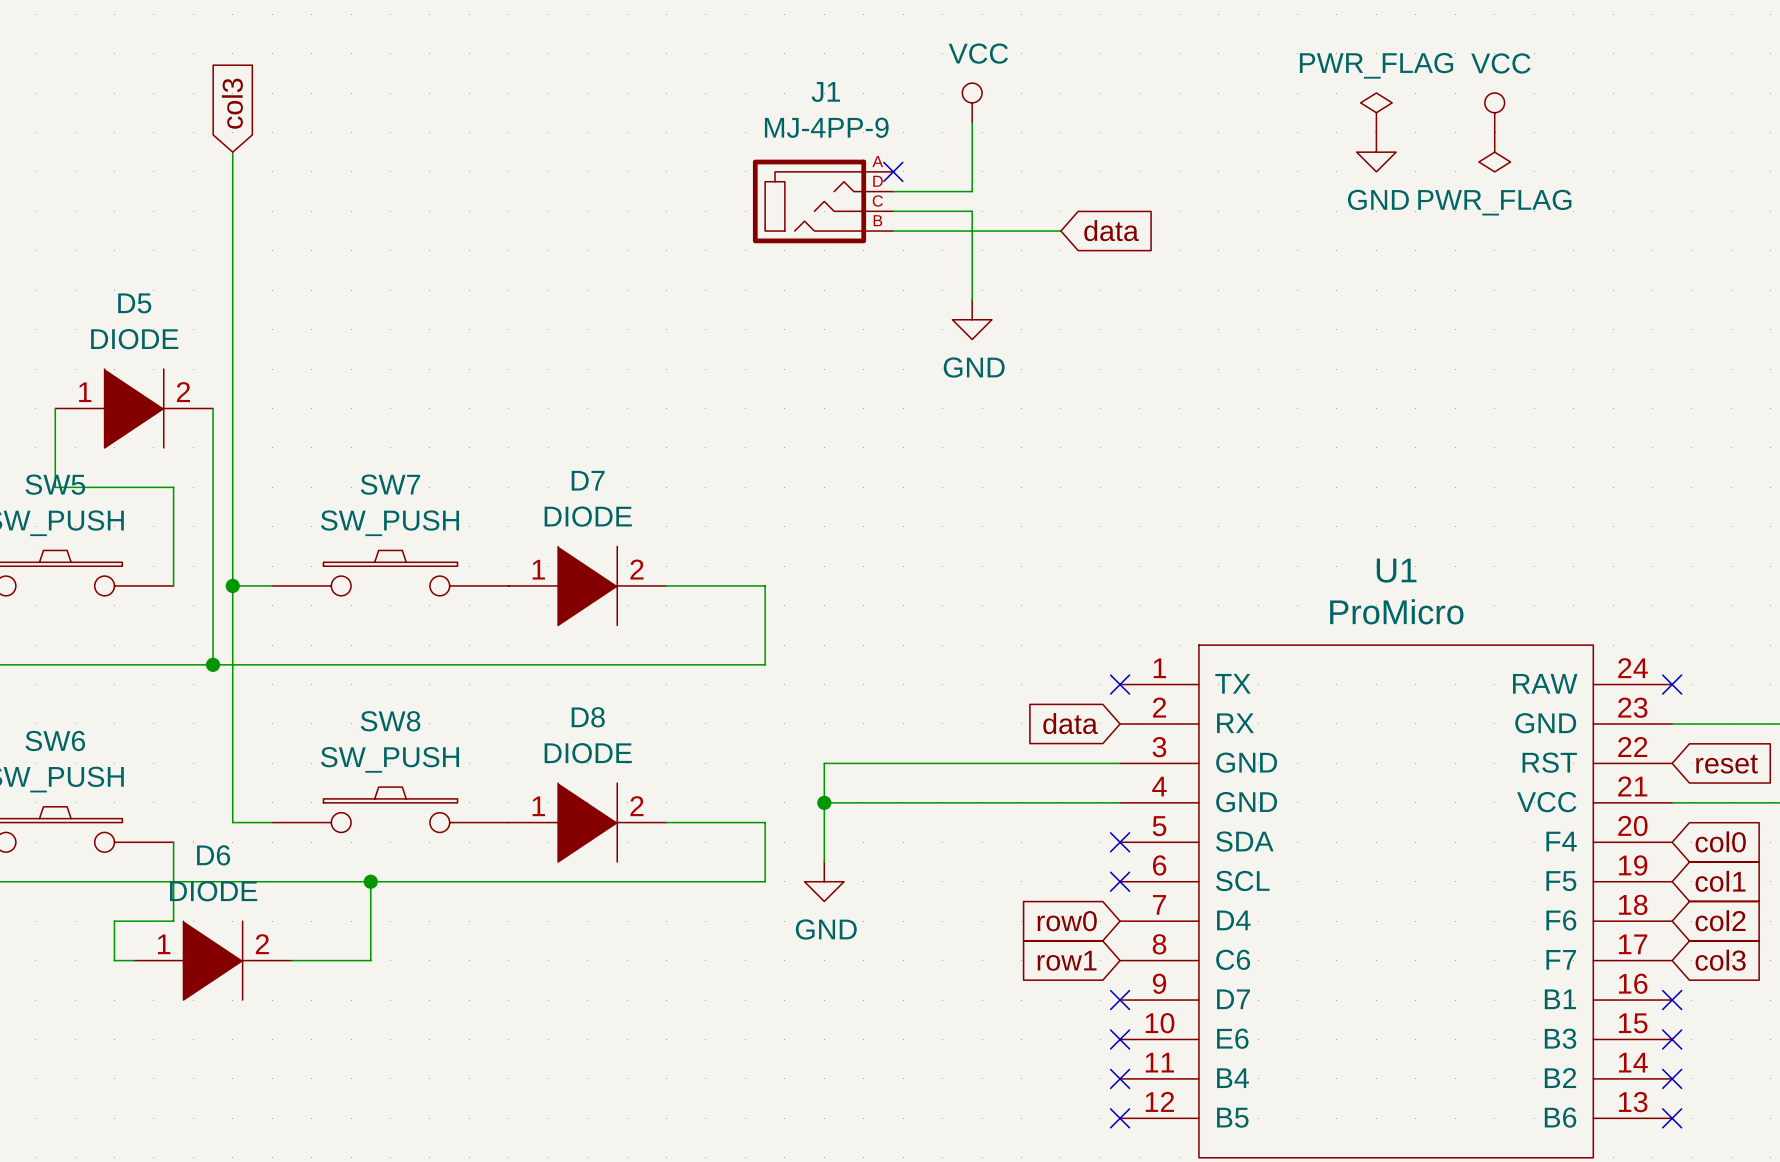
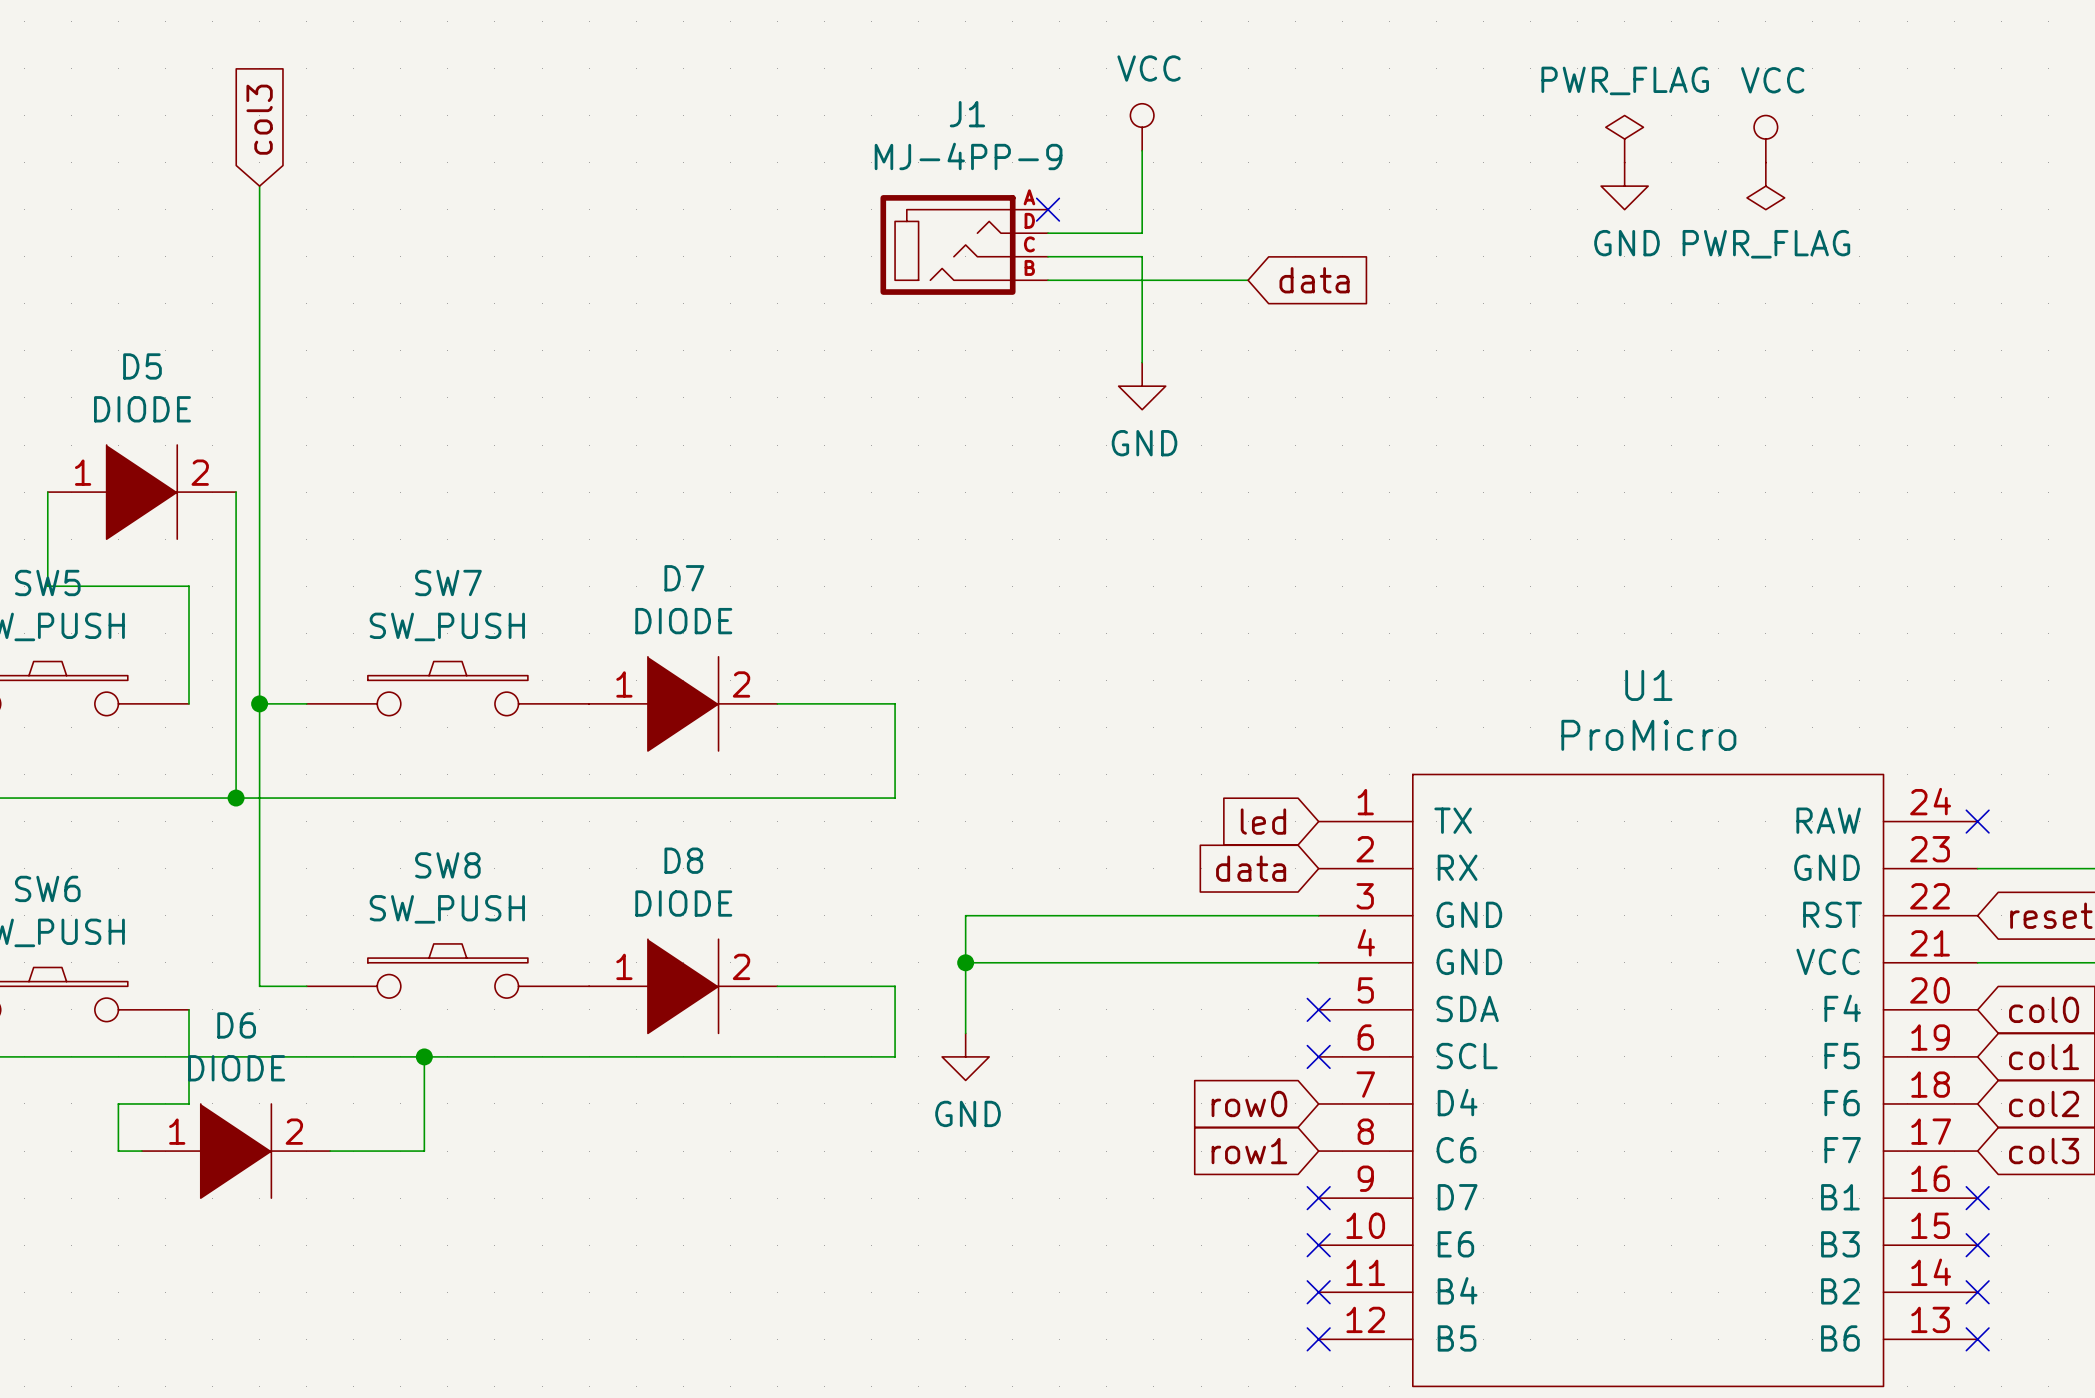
global label: none -> led (1263, 821)
no-connect mark: (1120, 684) -> none

